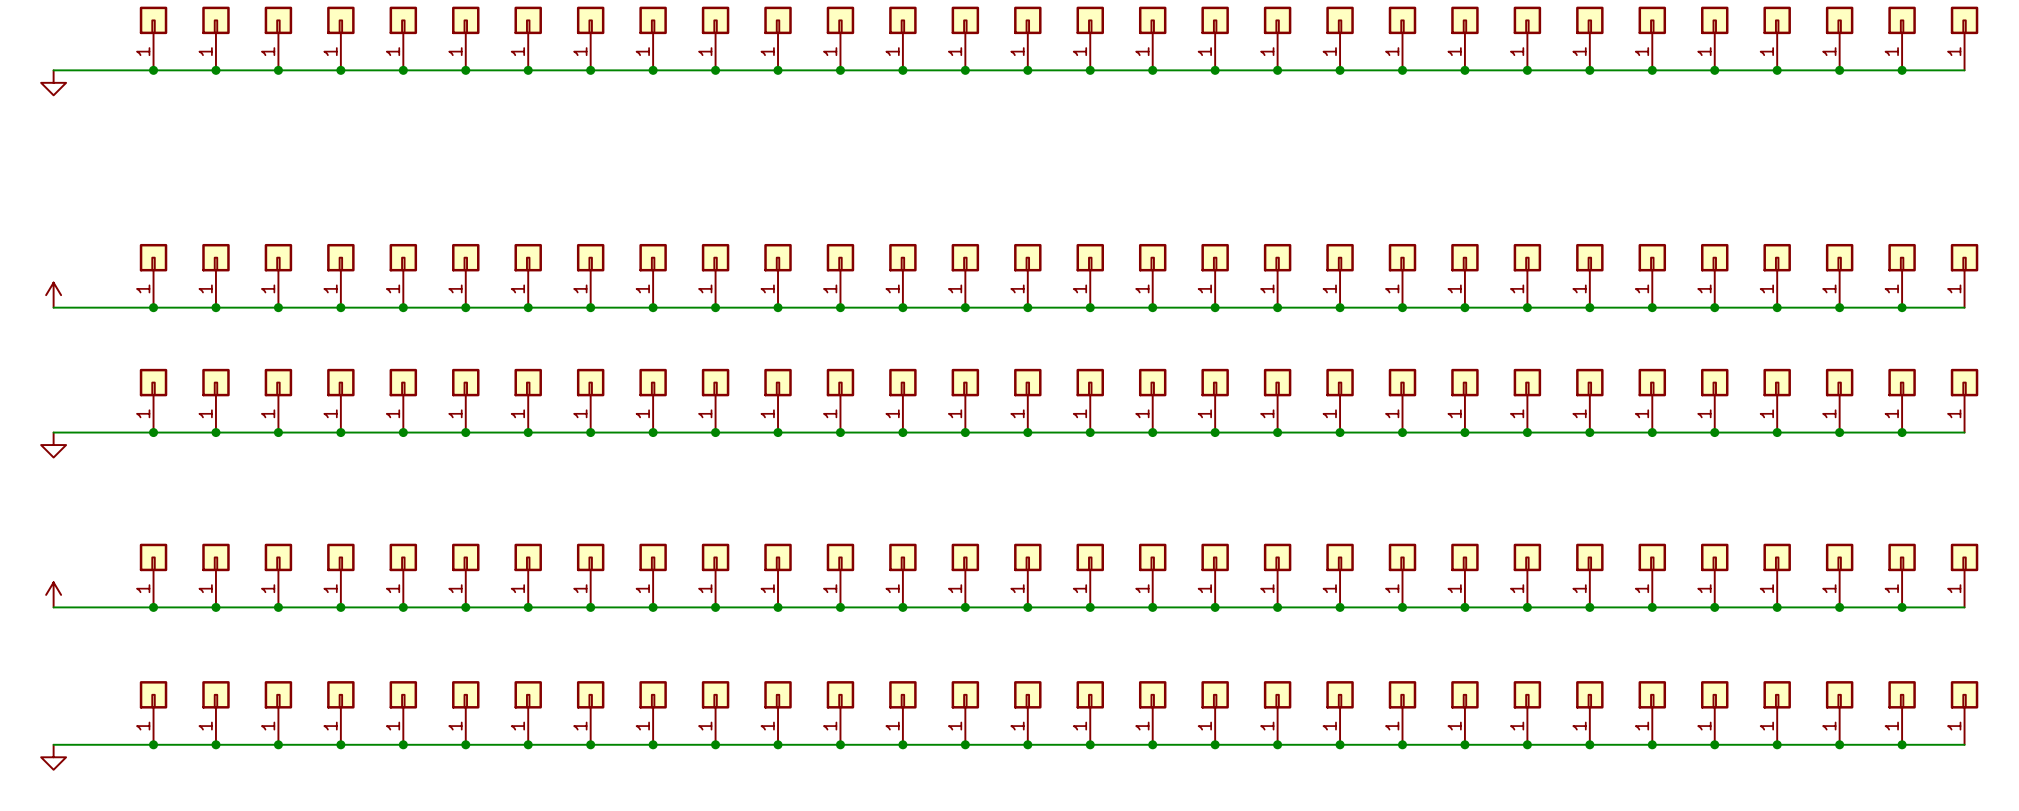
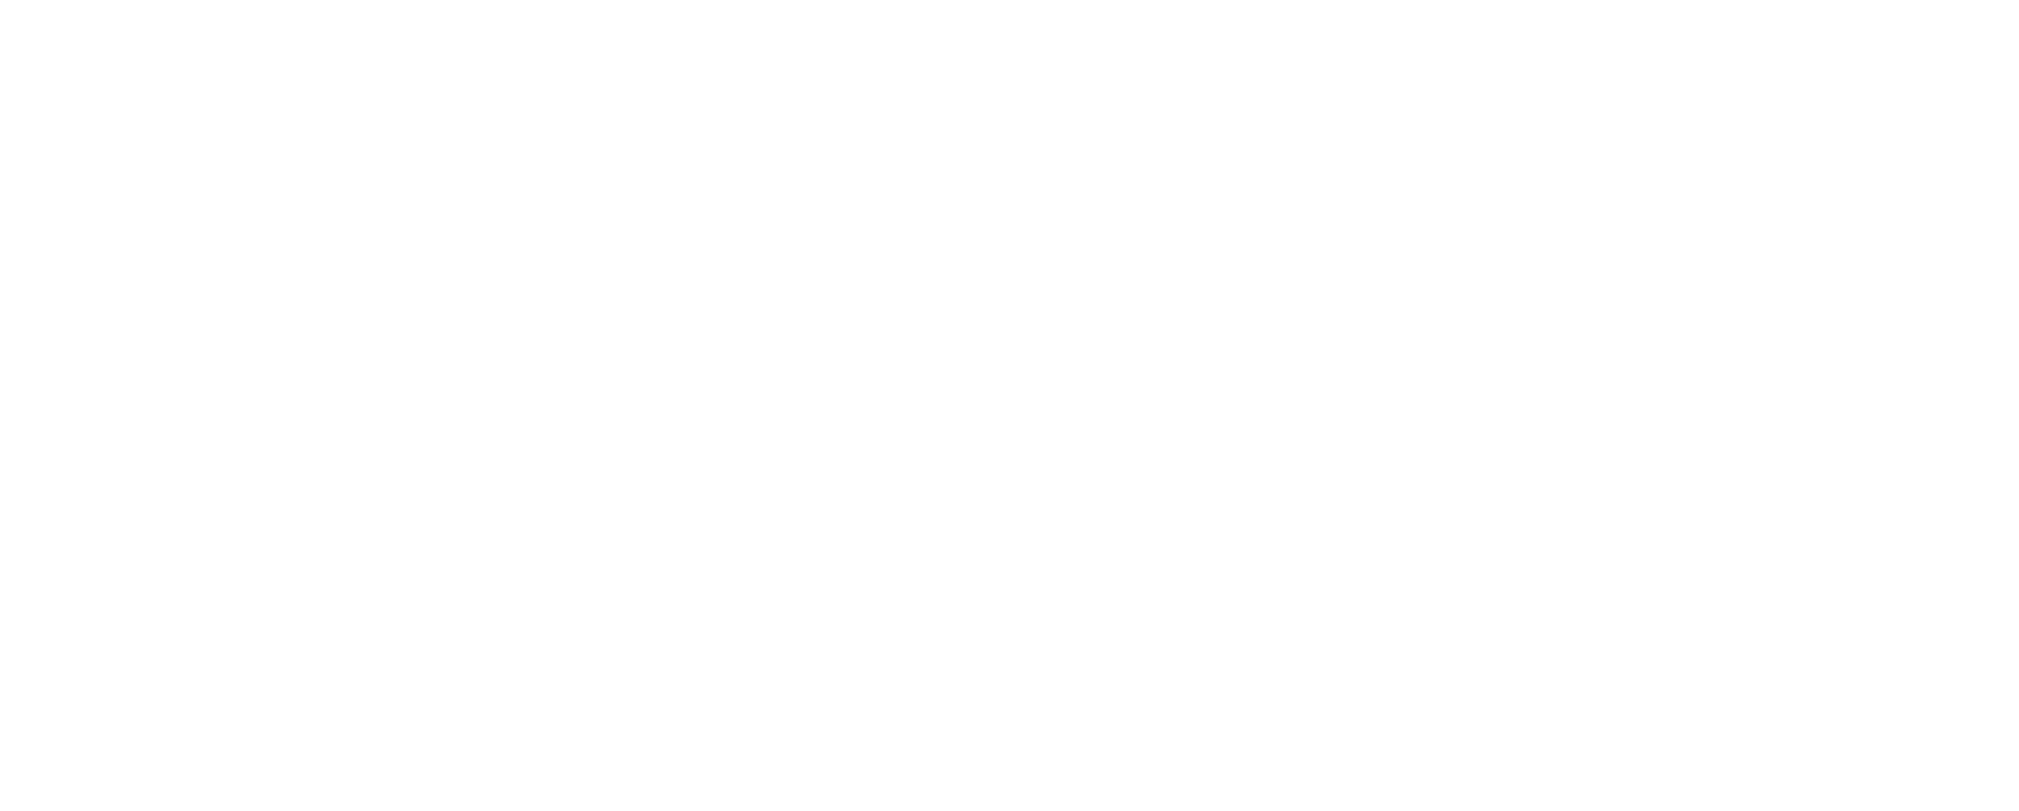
part: (153, 38) -> none
part: (215, 38) -> none
part: (278, 38) -> none
part: (340, 38) -> none
part: (403, 38) -> none
part: (465, 38) -> none
part: (528, 38) -> none
part: (590, 38) -> none
part: (653, 38) -> none
part: (715, 38) -> none
part: (778, 38) -> none
part: (840, 38) -> none
part: (902, 38) -> none
part: (965, 38) -> none
part: (1027, 38) -> none
part: (1090, 38) -> none
part: (1152, 38) -> none
part: (1215, 38) -> none
part: (1277, 38) -> none
part: (1340, 38) -> none
part: (1402, 38) -> none
part: (1464, 38) -> none
part: (1527, 38) -> none
part: (1589, 38) -> none
part: (1652, 38) -> none
part: (1714, 38) -> none
part: (1777, 38) -> none
part: (1839, 38) -> none
part: (1902, 38) -> none
part: (1964, 38) -> none
wire: (53, 70) (1964, 70) -> none
junction: (153, 70) -> none
junction: (215, 70) -> none
junction: (278, 70) -> none
junction: (340, 70) -> none
junction: (403, 70) -> none
junction: (465, 70) -> none
junction: (528, 70) -> none
junction: (590, 70) -> none
junction: (653, 70) -> none
junction: (715, 70) -> none
junction: (778, 70) -> none
junction: (840, 70) -> none
junction: (902, 70) -> none
junction: (965, 70) -> none
junction: (1027, 70) -> none
junction: (1090, 70) -> none
junction: (1152, 70) -> none
junction: (1215, 70) -> none
junction: (1277, 70) -> none
junction: (1340, 70) -> none
junction: (1402, 70) -> none
junction: (1464, 70) -> none
junction: (1527, 70) -> none
junction: (1589, 70) -> none
junction: (1652, 70) -> none
junction: (1714, 70) -> none
junction: (1777, 70) -> none
junction: (1839, 70) -> none
junction: (1902, 70) -> none
power symbol: (53, 82) -> none
part: (153, 275) -> none
part: (215, 275) -> none
part: (278, 275) -> none
part: (340, 275) -> none
part: (403, 275) -> none
part: (465, 275) -> none
part: (528, 275) -> none
part: (590, 275) -> none
part: (653, 275) -> none
part: (715, 275) -> none
part: (778, 275) -> none
part: (840, 275) -> none
part: (902, 275) -> none
part: (965, 275) -> none
part: (1027, 275) -> none
part: (1090, 275) -> none
part: (1152, 275) -> none
part: (1215, 275) -> none
part: (1277, 275) -> none
part: (1340, 275) -> none
part: (1402, 275) -> none
part: (1464, 275) -> none
part: (1527, 275) -> none
part: (1589, 275) -> none
part: (1652, 275) -> none
part: (1714, 275) -> none
part: (1777, 275) -> none
part: (1839, 275) -> none
part: (1902, 275) -> none
part: (1964, 275) -> none
power symbol: (53, 295) -> none
wire: (53, 307) (1964, 307) -> none
junction: (153, 307) -> none
junction: (215, 307) -> none
junction: (278, 307) -> none
junction: (340, 307) -> none
junction: (403, 307) -> none
junction: (465, 307) -> none
junction: (528, 307) -> none
junction: (590, 307) -> none
junction: (653, 307) -> none
junction: (715, 307) -> none
junction: (778, 307) -> none
junction: (840, 307) -> none
junction: (902, 307) -> none
junction: (965, 307) -> none
junction: (1027, 307) -> none
junction: (1090, 307) -> none
junction: (1152, 307) -> none
junction: (1215, 307) -> none
junction: (1277, 307) -> none
junction: (1340, 307) -> none
junction: (1402, 307) -> none
junction: (1464, 307) -> none
junction: (1527, 307) -> none
junction: (1589, 307) -> none
junction: (1652, 307) -> none
junction: (1714, 307) -> none
junction: (1777, 307) -> none
junction: (1839, 307) -> none
junction: (1902, 307) -> none
part: (153, 400) -> none
part: (215, 400) -> none
part: (278, 400) -> none
part: (340, 400) -> none
part: (403, 400) -> none
part: (465, 400) -> none
part: (528, 400) -> none
part: (590, 400) -> none
part: (653, 400) -> none
part: (715, 400) -> none
part: (778, 400) -> none
part: (840, 400) -> none
part: (902, 400) -> none
part: (965, 400) -> none
part: (1027, 400) -> none
part: (1090, 400) -> none
part: (1152, 400) -> none
part: (1215, 400) -> none
part: (1277, 400) -> none
part: (1340, 400) -> none
part: (1402, 400) -> none
part: (1464, 400) -> none
part: (1527, 400) -> none
part: (1589, 400) -> none
part: (1652, 400) -> none
part: (1714, 400) -> none
part: (1777, 400) -> none
part: (1839, 400) -> none
part: (1902, 400) -> none
part: (1964, 400) -> none
wire: (53, 432) (1964, 432) -> none
junction: (153, 432) -> none
junction: (215, 432) -> none
junction: (278, 432) -> none
junction: (340, 432) -> none
junction: (403, 432) -> none
junction: (465, 432) -> none
junction: (528, 432) -> none
junction: (590, 432) -> none
junction: (653, 432) -> none
junction: (715, 432) -> none
junction: (778, 432) -> none
junction: (840, 432) -> none
junction: (902, 432) -> none
junction: (965, 432) -> none
junction: (1027, 432) -> none
junction: (1090, 432) -> none
junction: (1152, 432) -> none
junction: (1215, 432) -> none
junction: (1277, 432) -> none
junction: (1340, 432) -> none
junction: (1402, 432) -> none
junction: (1464, 432) -> none
junction: (1527, 432) -> none
junction: (1589, 432) -> none
junction: (1652, 432) -> none
junction: (1714, 432) -> none
junction: (1777, 432) -> none
junction: (1839, 432) -> none
junction: (1902, 432) -> none
power symbol: (53, 445) -> none
part: (153, 575) -> none
part: (215, 575) -> none
part: (278, 575) -> none
part: (340, 575) -> none
part: (403, 575) -> none
part: (465, 575) -> none
part: (528, 575) -> none
part: (590, 575) -> none
part: (653, 575) -> none
part: (715, 575) -> none
part: (778, 575) -> none
part: (840, 575) -> none
part: (902, 575) -> none
part: (965, 575) -> none
part: (1027, 575) -> none
part: (1090, 575) -> none
part: (1152, 575) -> none
part: (1215, 575) -> none
part: (1277, 575) -> none
part: (1340, 575) -> none
part: (1402, 575) -> none
part: (1464, 575) -> none
part: (1527, 575) -> none
part: (1589, 575) -> none
part: (1652, 575) -> none
part: (1714, 575) -> none
part: (1777, 575) -> none
part: (1839, 575) -> none
part: (1902, 575) -> none
part: (1964, 575) -> none
power symbol: (53, 594) -> none
wire: (53, 607) (1964, 607) -> none
junction: (153, 607) -> none
junction: (215, 607) -> none
junction: (278, 607) -> none
junction: (340, 607) -> none
junction: (403, 607) -> none
junction: (465, 607) -> none
junction: (528, 607) -> none
junction: (590, 607) -> none
junction: (653, 607) -> none
junction: (715, 607) -> none
junction: (778, 607) -> none
junction: (840, 607) -> none
junction: (902, 607) -> none
junction: (965, 607) -> none
junction: (1027, 607) -> none
junction: (1090, 607) -> none
junction: (1152, 607) -> none
junction: (1215, 607) -> none
junction: (1277, 607) -> none
junction: (1340, 607) -> none
junction: (1402, 607) -> none
junction: (1464, 607) -> none
junction: (1527, 607) -> none
junction: (1589, 607) -> none
junction: (1652, 607) -> none
junction: (1714, 607) -> none
junction: (1777, 607) -> none
junction: (1839, 607) -> none
junction: (1902, 607) -> none
part: (153, 712) -> none
part: (215, 712) -> none
part: (278, 712) -> none
part: (340, 712) -> none
part: (403, 712) -> none
part: (465, 712) -> none
part: (528, 712) -> none
part: (590, 712) -> none
part: (653, 712) -> none
part: (715, 712) -> none
part: (778, 712) -> none
part: (840, 712) -> none
part: (902, 712) -> none
part: (965, 712) -> none
part: (1027, 712) -> none
part: (1090, 712) -> none
part: (1152, 712) -> none
part: (1215, 712) -> none
part: (1277, 712) -> none
part: (1340, 712) -> none
part: (1402, 712) -> none
part: (1464, 712) -> none
part: (1527, 712) -> none
part: (1589, 712) -> none
part: (1652, 712) -> none
part: (1714, 712) -> none
part: (1777, 712) -> none
part: (1839, 712) -> none
part: (1902, 712) -> none
part: (1964, 712) -> none
wire: (53, 744) (1964, 744) -> none
junction: (153, 744) -> none
junction: (215, 744) -> none
junction: (278, 744) -> none
junction: (340, 744) -> none
junction: (403, 744) -> none
junction: (465, 744) -> none
junction: (528, 744) -> none
junction: (590, 744) -> none
junction: (653, 744) -> none
junction: (715, 744) -> none
junction: (778, 744) -> none
junction: (840, 744) -> none
junction: (902, 744) -> none
junction: (965, 744) -> none
junction: (1027, 744) -> none
junction: (1090, 744) -> none
junction: (1152, 744) -> none
junction: (1215, 744) -> none
junction: (1277, 744) -> none
junction: (1340, 744) -> none
junction: (1402, 744) -> none
junction: (1464, 744) -> none
junction: (1527, 744) -> none
junction: (1589, 744) -> none
junction: (1652, 744) -> none
junction: (1714, 744) -> none
junction: (1777, 744) -> none
junction: (1839, 744) -> none
junction: (1902, 744) -> none
power symbol: (53, 757) -> none

